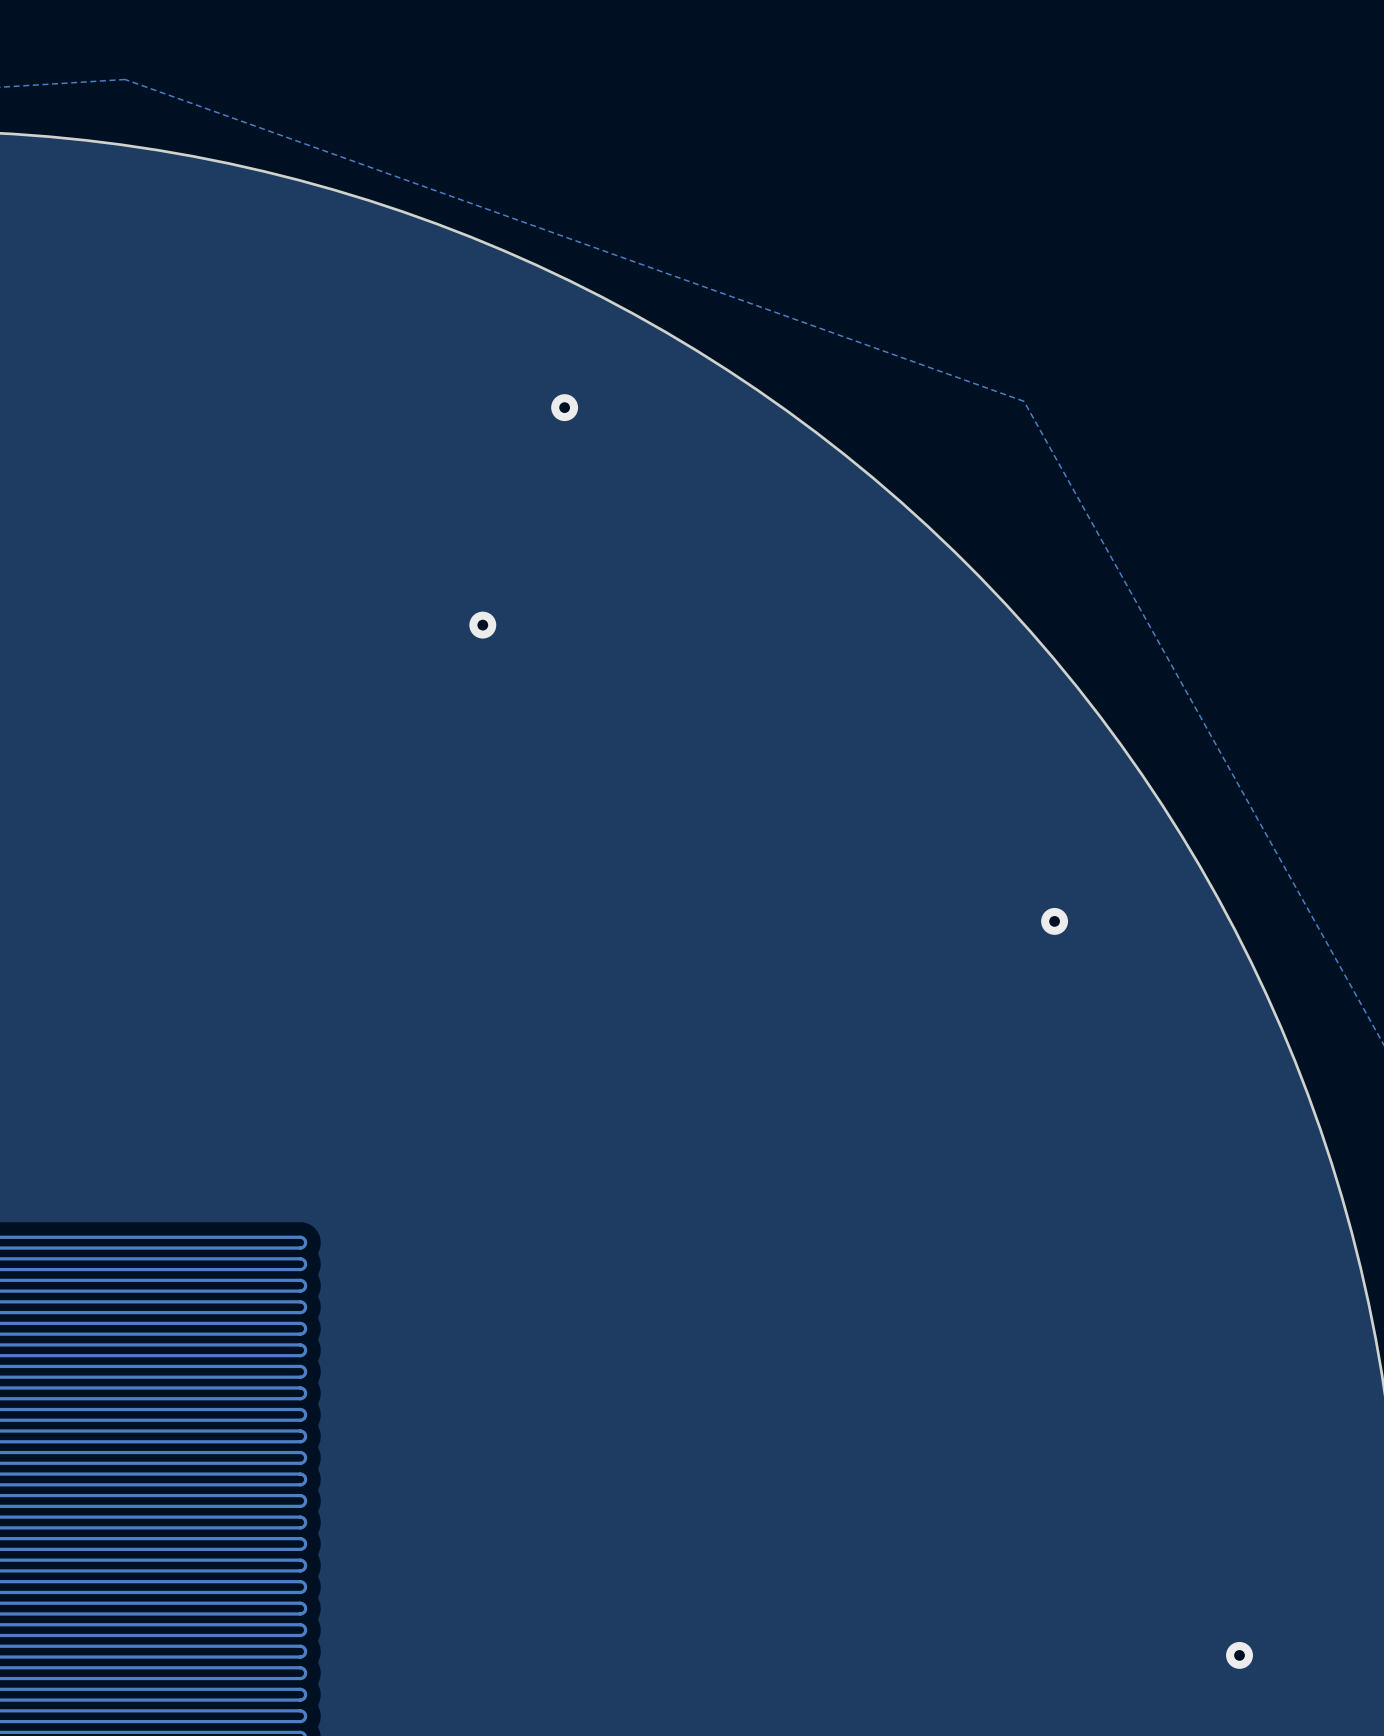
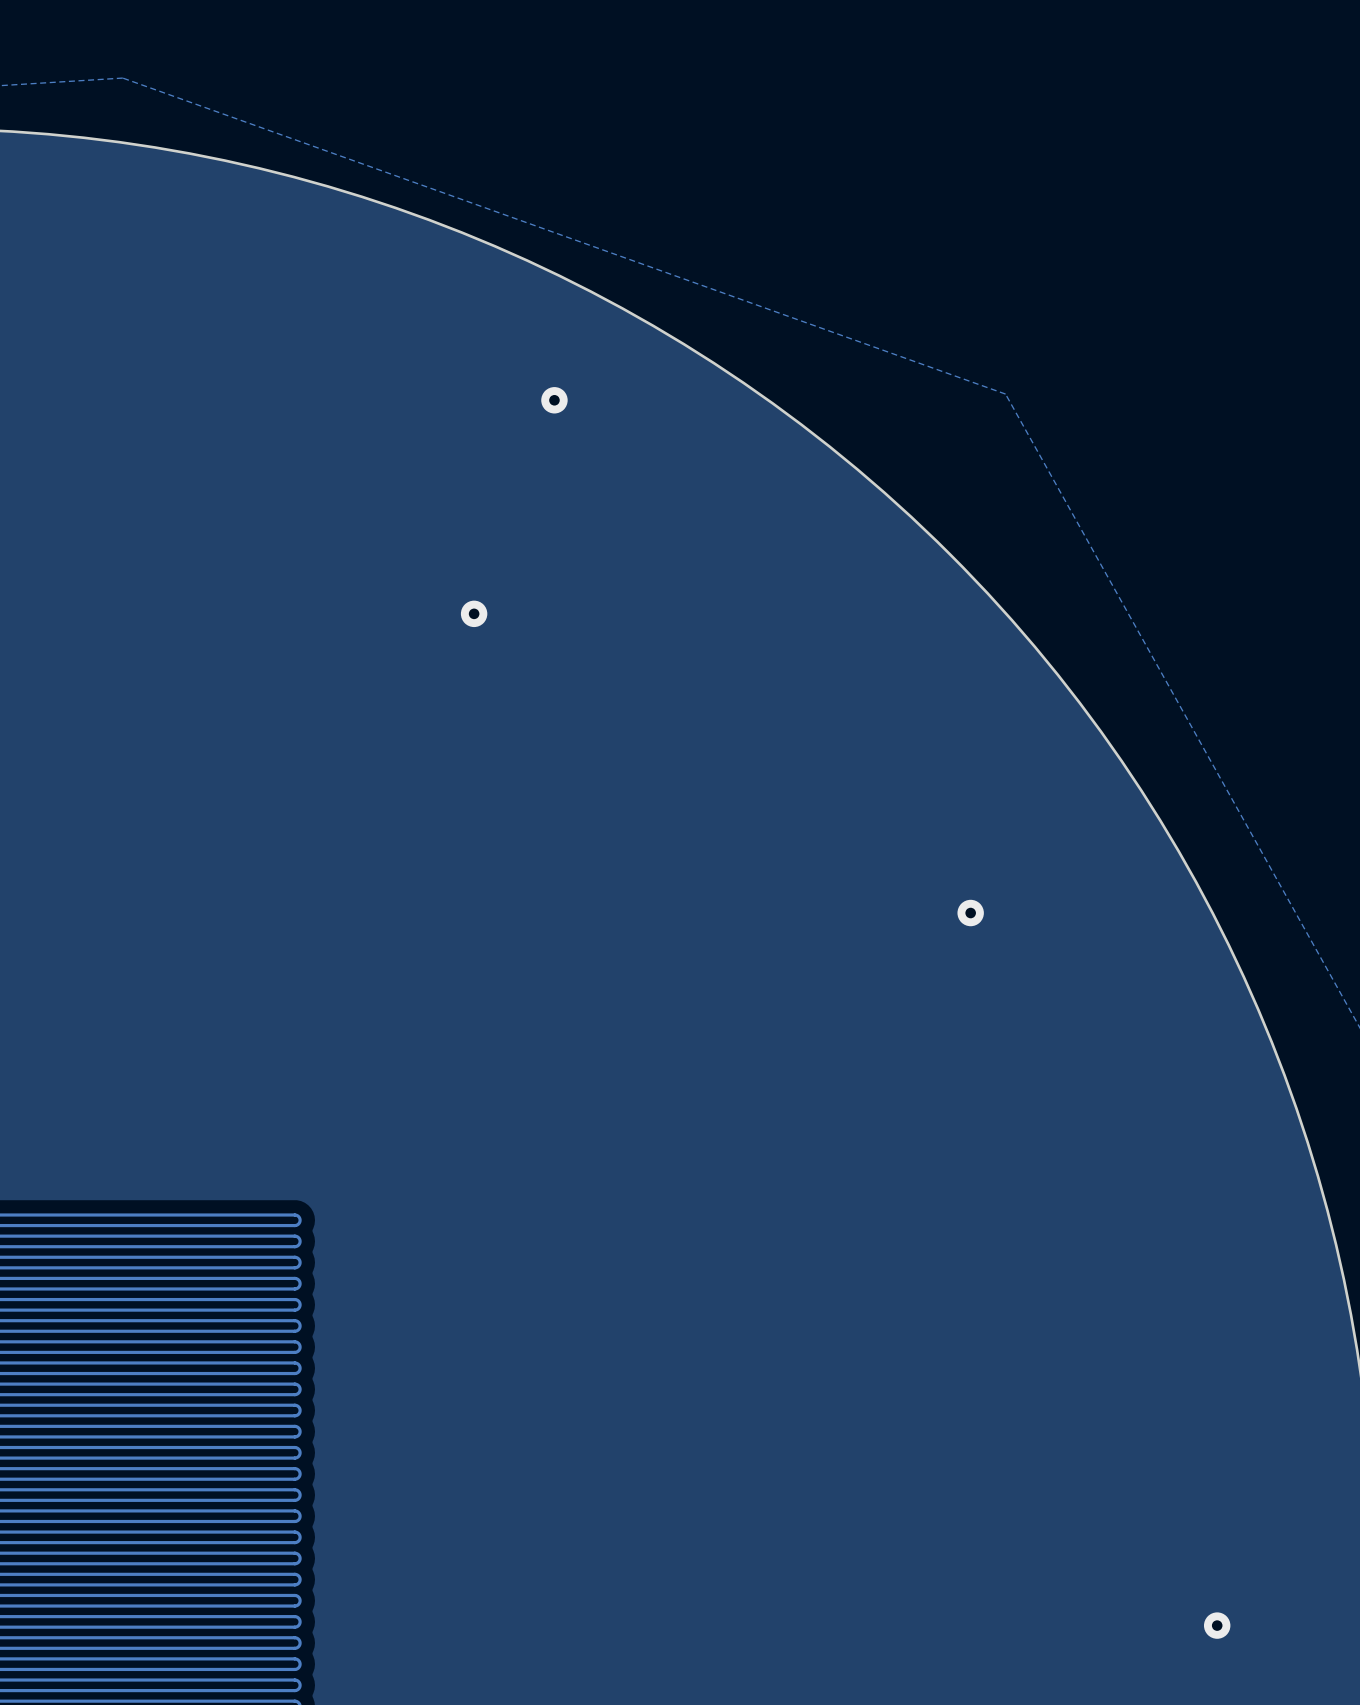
via position: (1054, 921) -> (970, 913)

